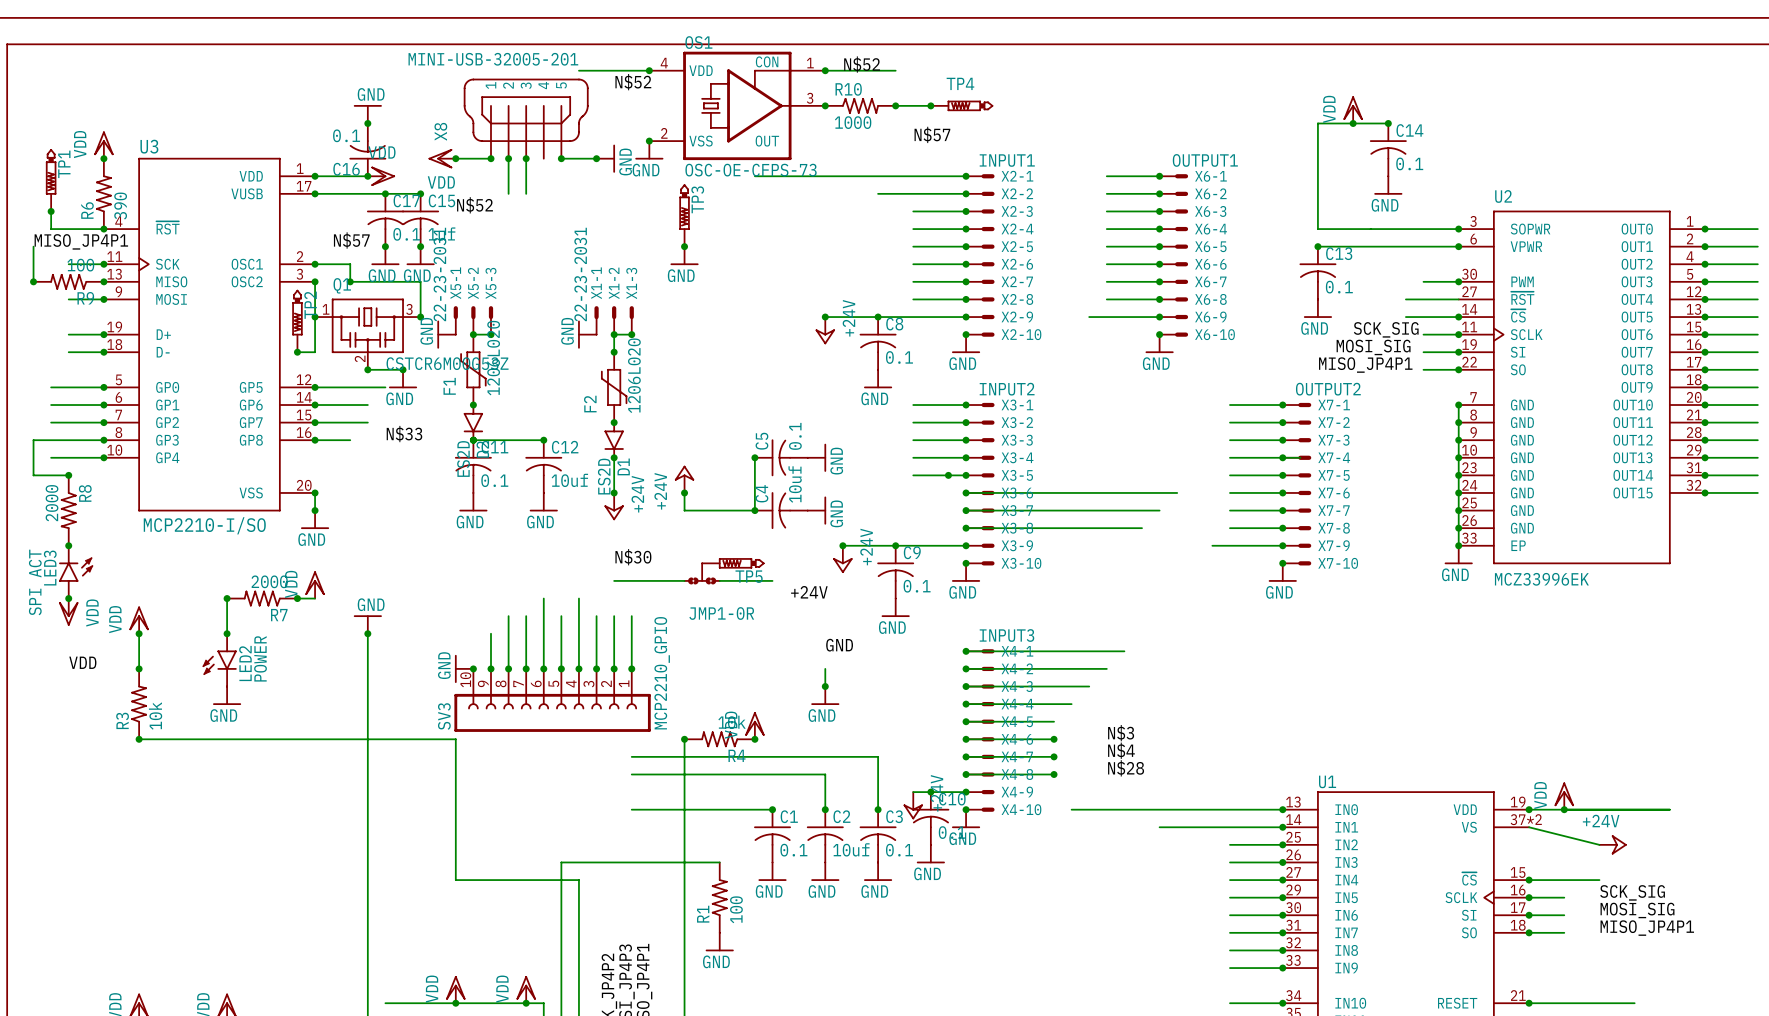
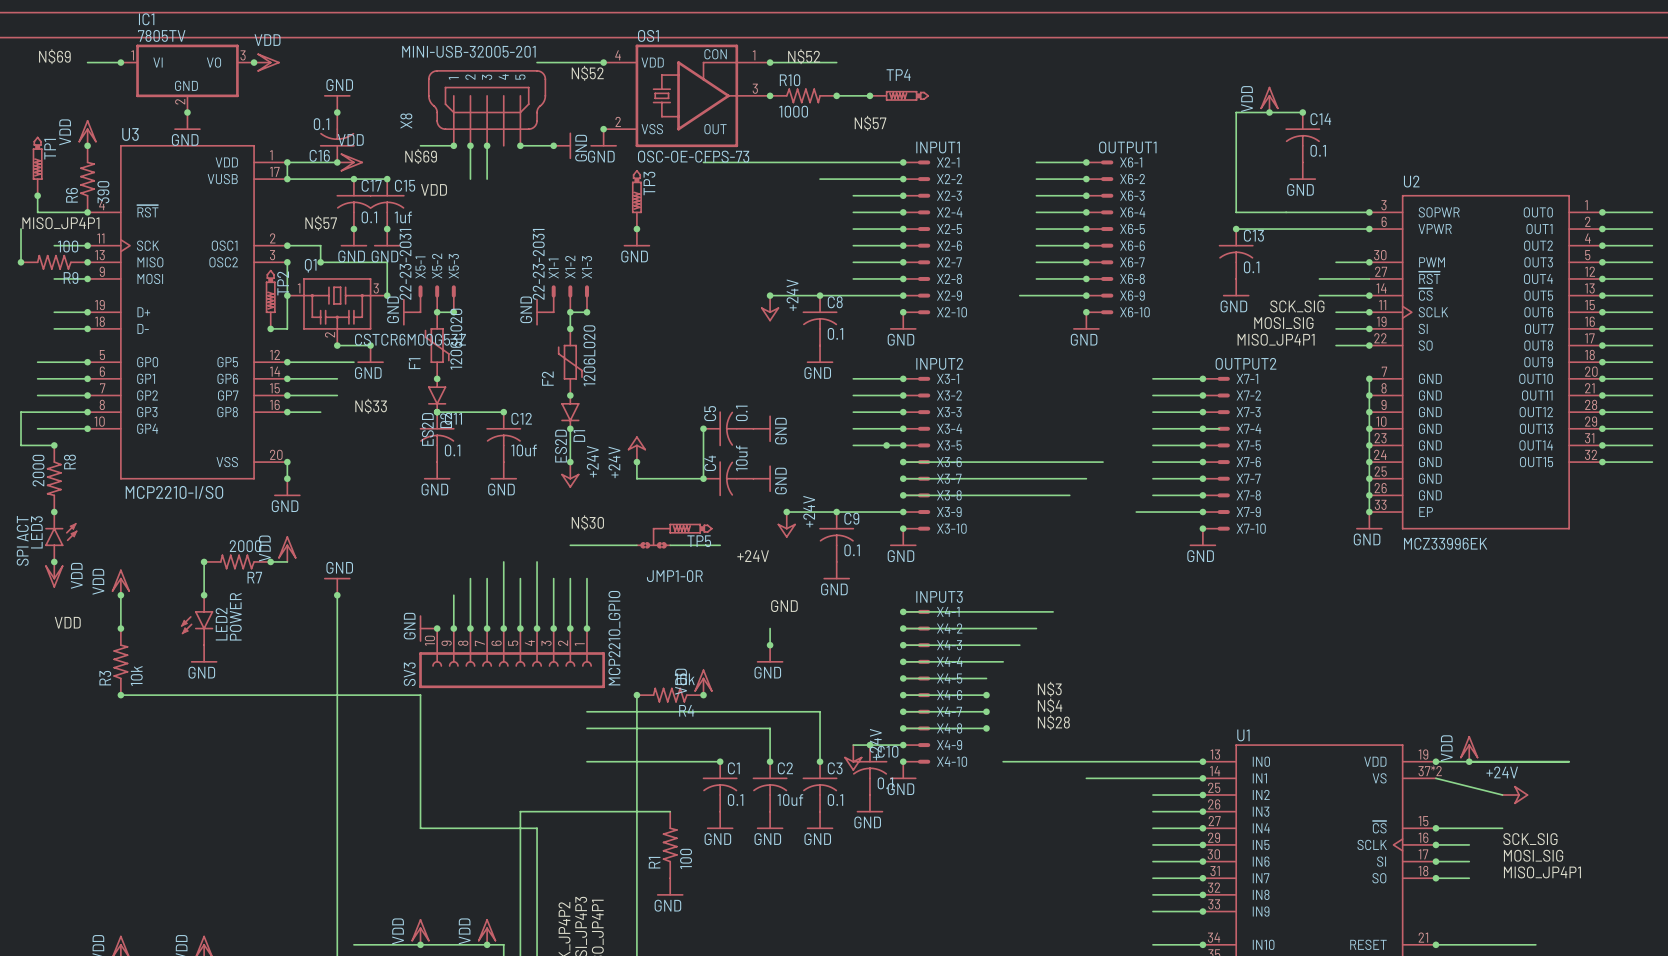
label: none -> N$69 (54, 56)
wire: none -> (87, 62) (120, 62)
junction: none -> (120, 62)
junction: none -> (254, 62)
IC1: none -> 7805TV (187, 78)
junction: none -> (187, 112)
power symbol: none -> GND (187, 121)
power symbol rotation: 0° (440, 158) -> 180° (268, 62)
power symbol position: VDD (442, 158) -> VDD (266, 62)
junction: (455, 158) -> none
label: none -> N$69 (421, 156)
wire: none -> (287, 162) (287, 179)
label: N$52 (475, 205) -> VDD (433, 189)

